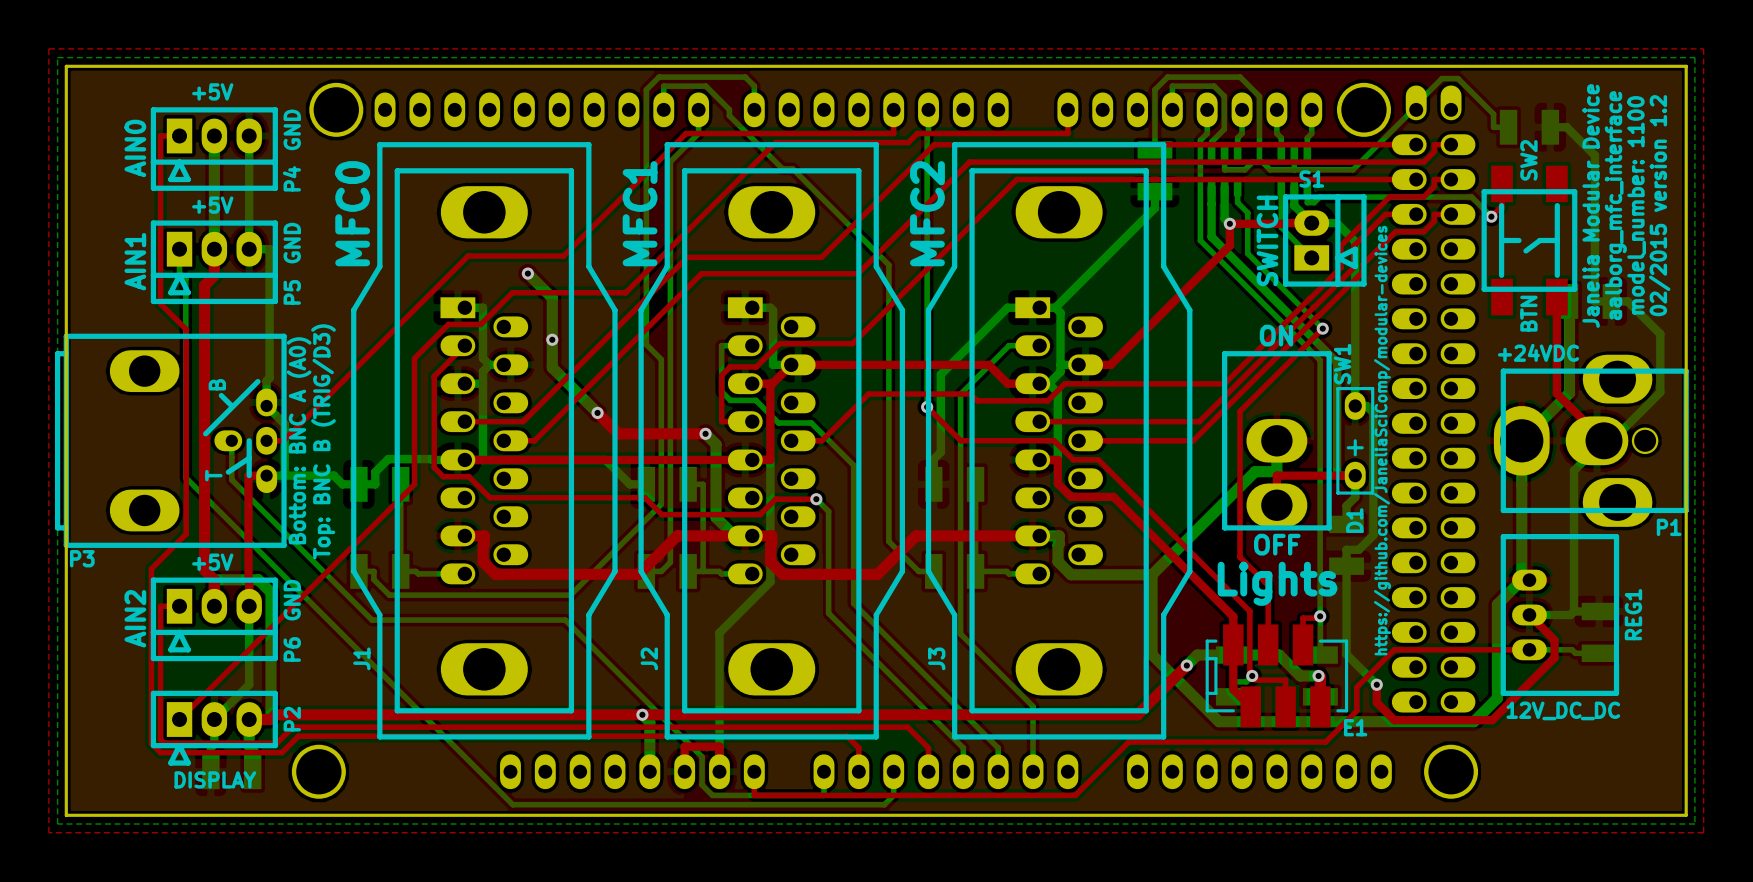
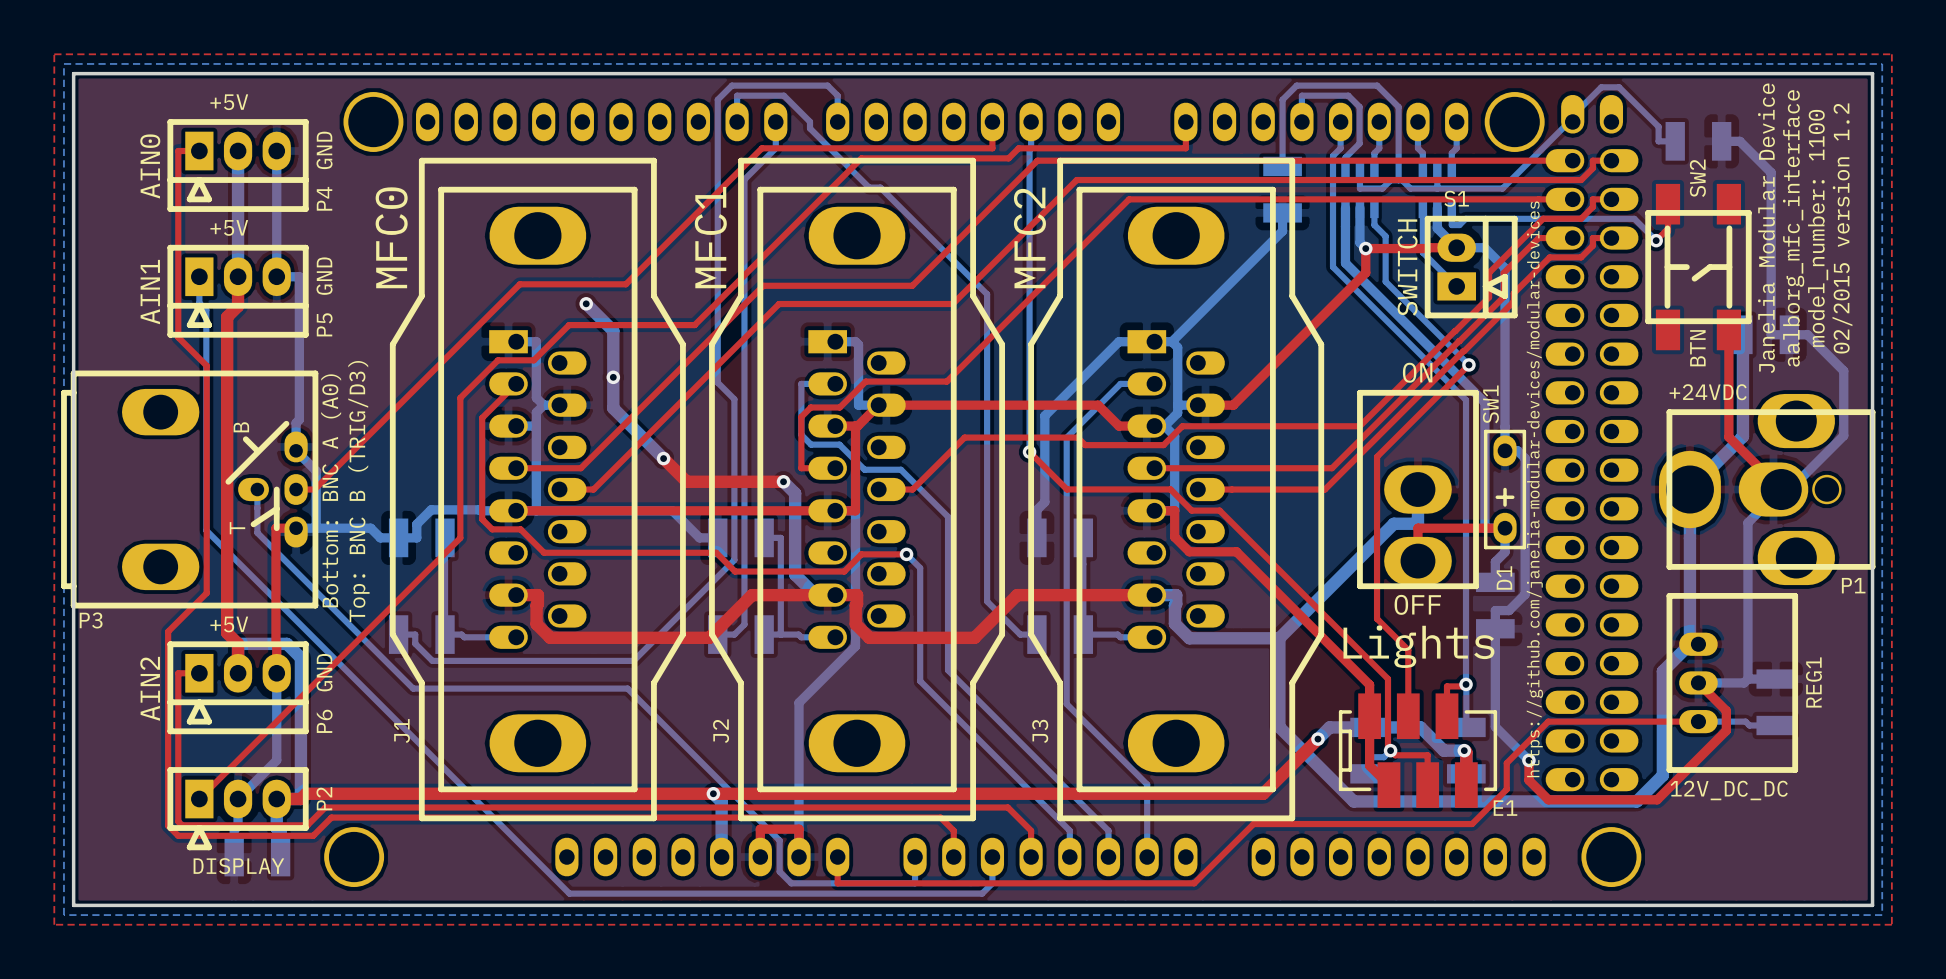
text: https://github.com/JaneliaSciComp/modular-devices (1382, 440) -> https://github.com/janelia-modular-devices/modular-devices (1534, 489)

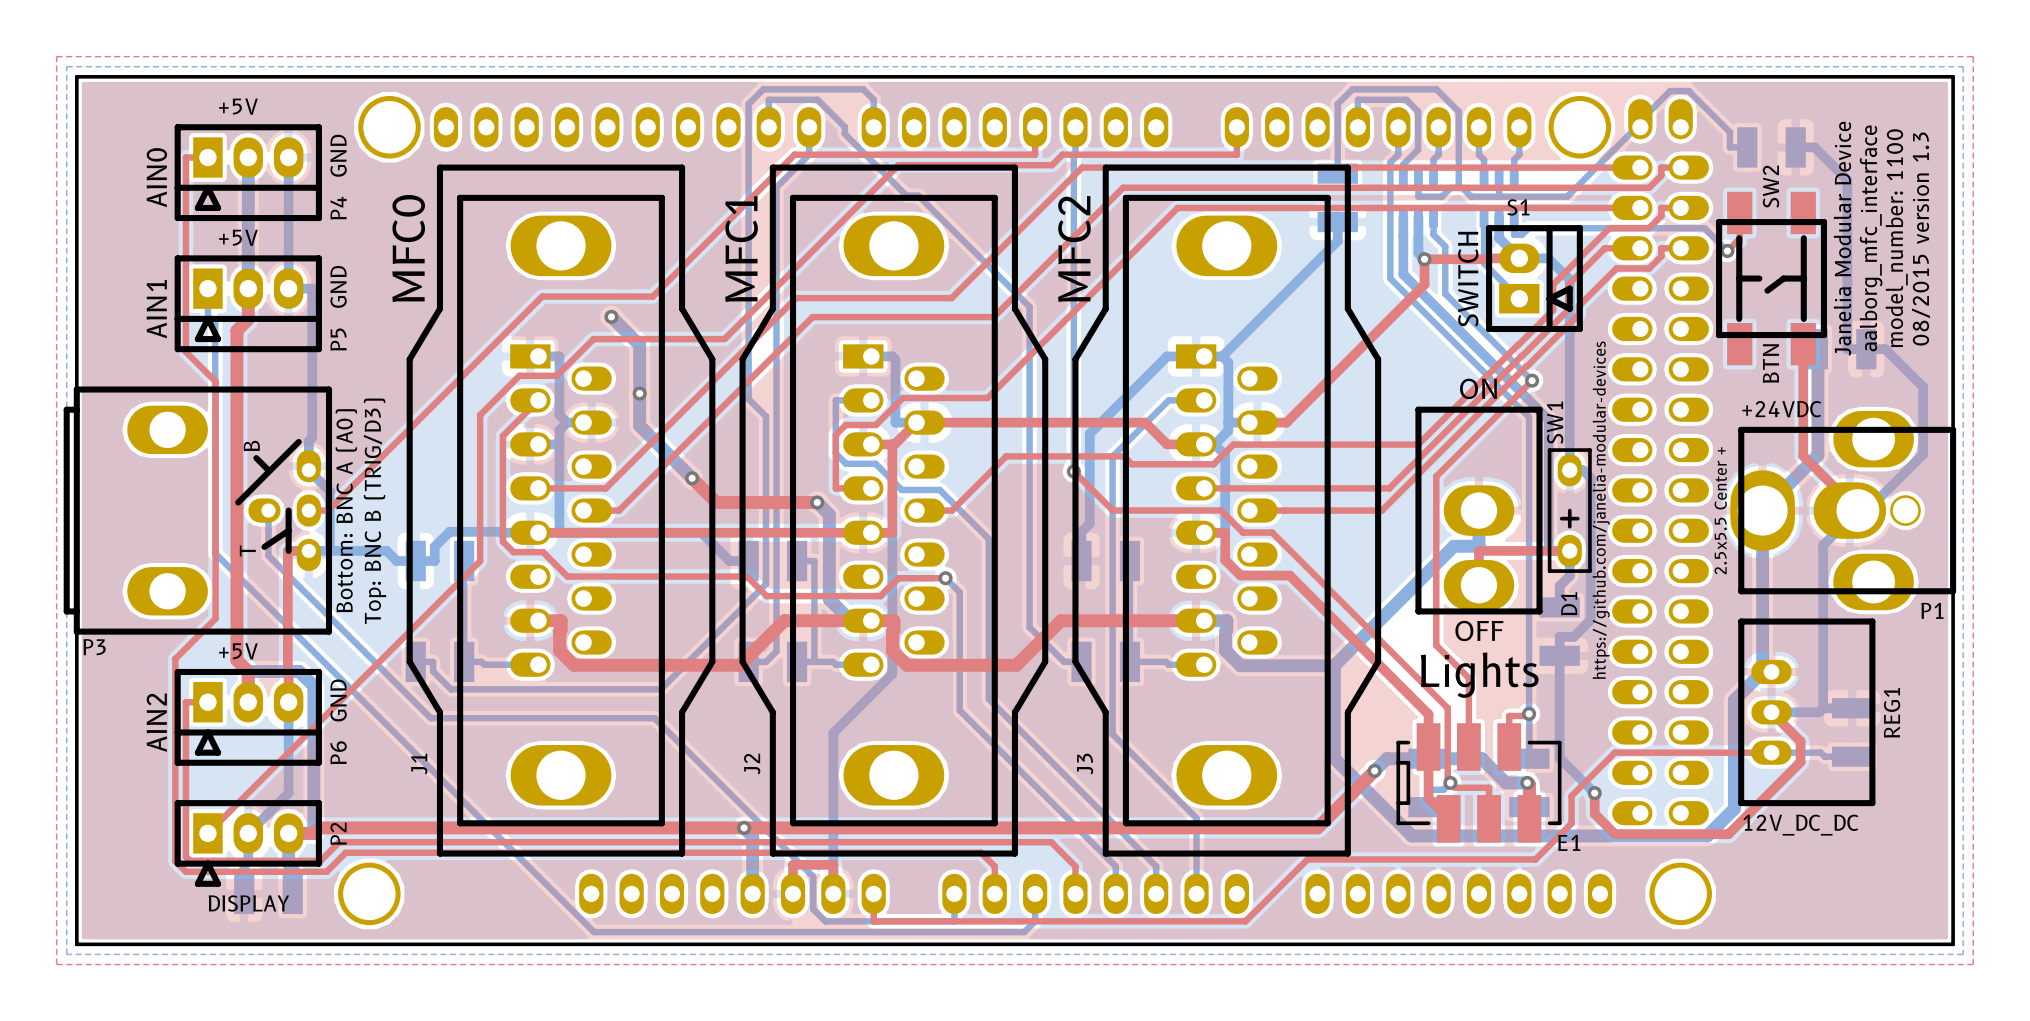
text: 02/2015 version 1.2 (1842, 228) -> 08/2015 version 1.3 (1920, 239)
text: https://github.com/janelia-modular-devices/modular-devices (1534, 489) -> https://github.com/janelia-modular-devices (1601, 510)
text: none -> 2.5x5.5 Center + (1720, 510)

